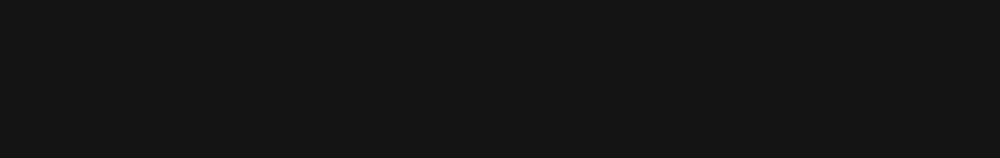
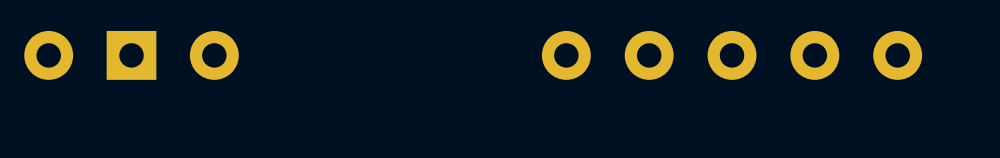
part: none -> (131, 55)
part: none -> (732, 55)

